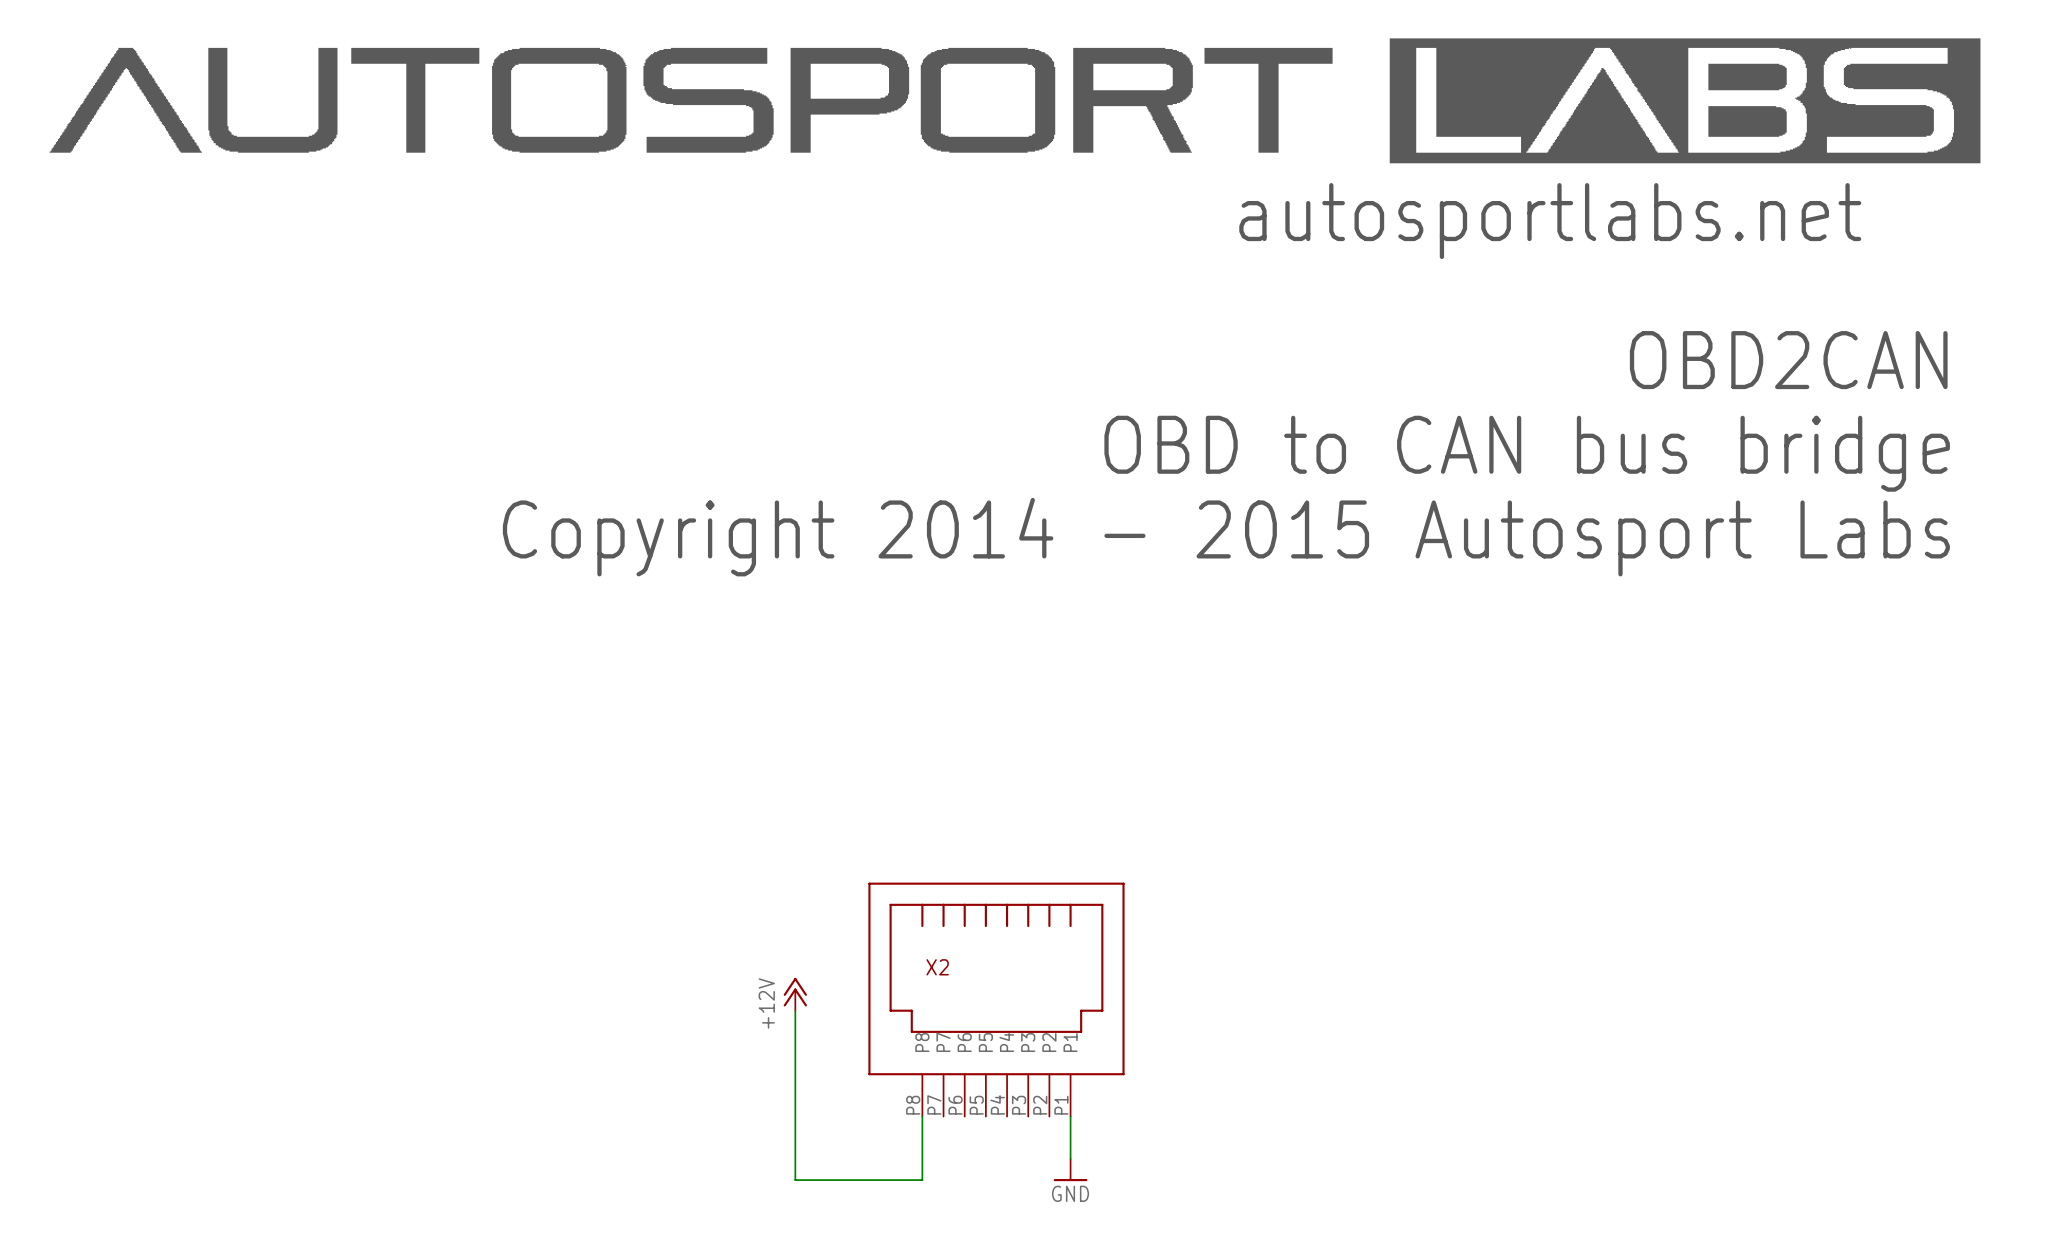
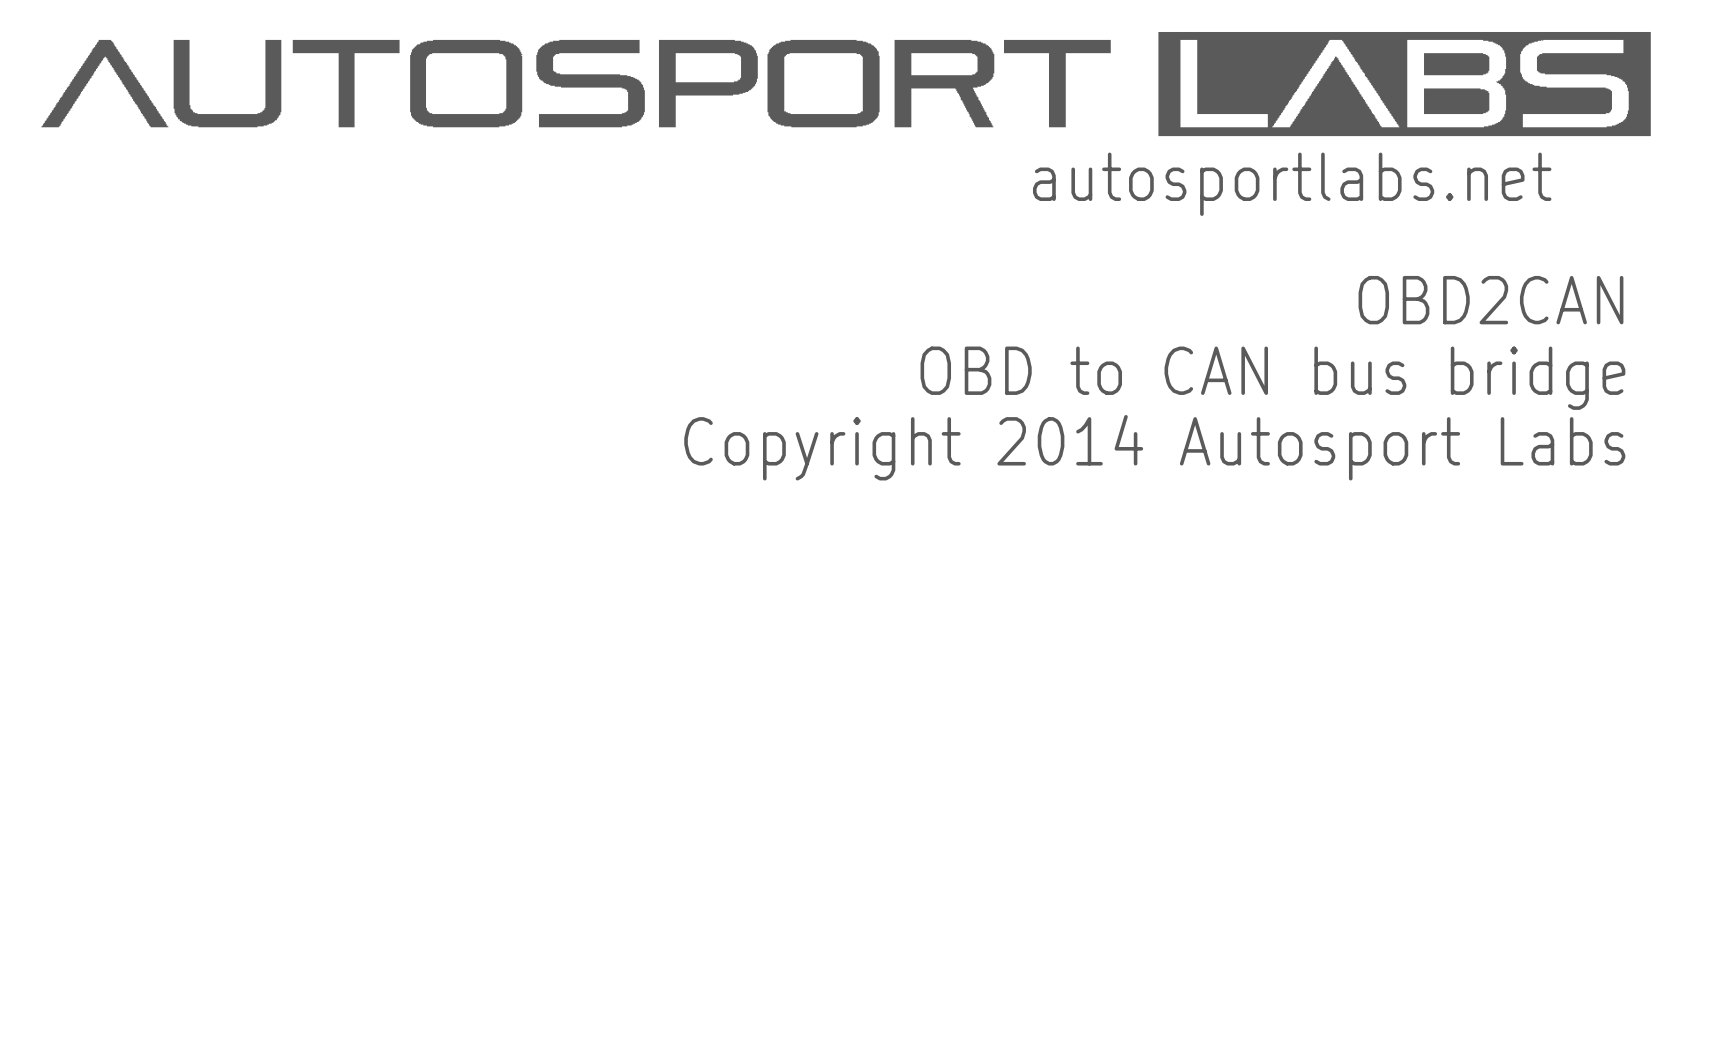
text: Copyright 2014 - 2015 Autosport Labs (1226, 537) -> Copyright 2014 Autosport Labs (1154, 447)
power symbol: +12V (795, 994) -> none
X2: (996, 999) -> none
wire: (795, 1010) (795, 1180) (922, 1180) (922, 1116) -> none
wire: (1070, 1116) (1070, 1158) -> none
power symbol: GND (1070, 1170) -> none

